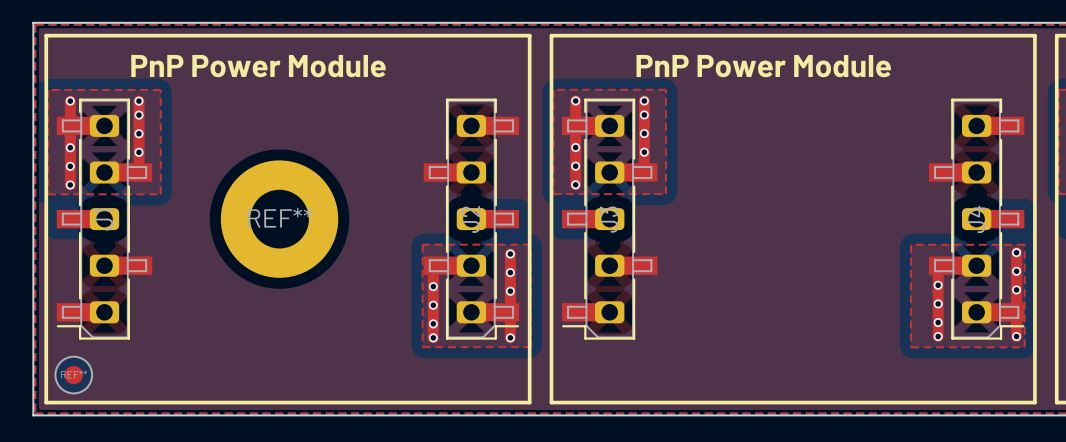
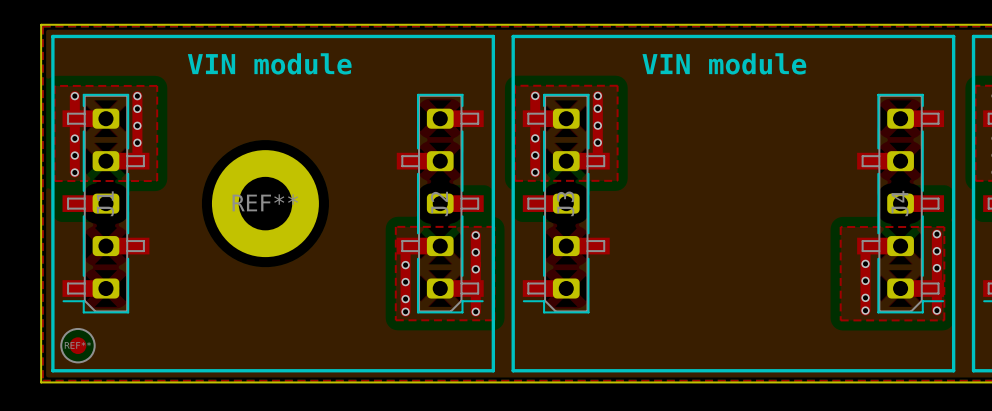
text: PnP Power Module (258, 66) -> none
text: none -> VIN module (269, 63)
text: PnP Power Module (763, 66) -> none
text: none -> VIN module (724, 63)

